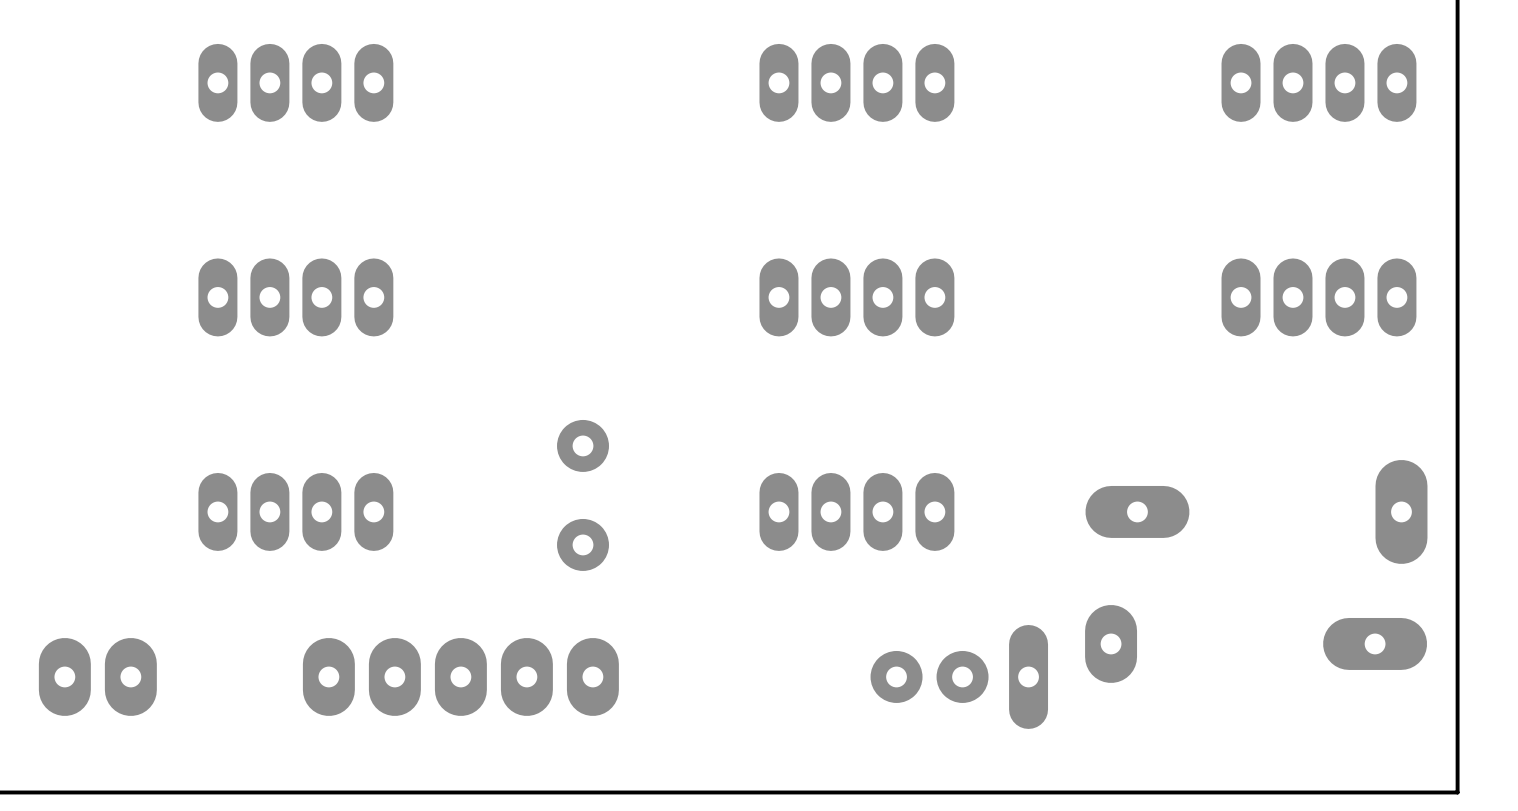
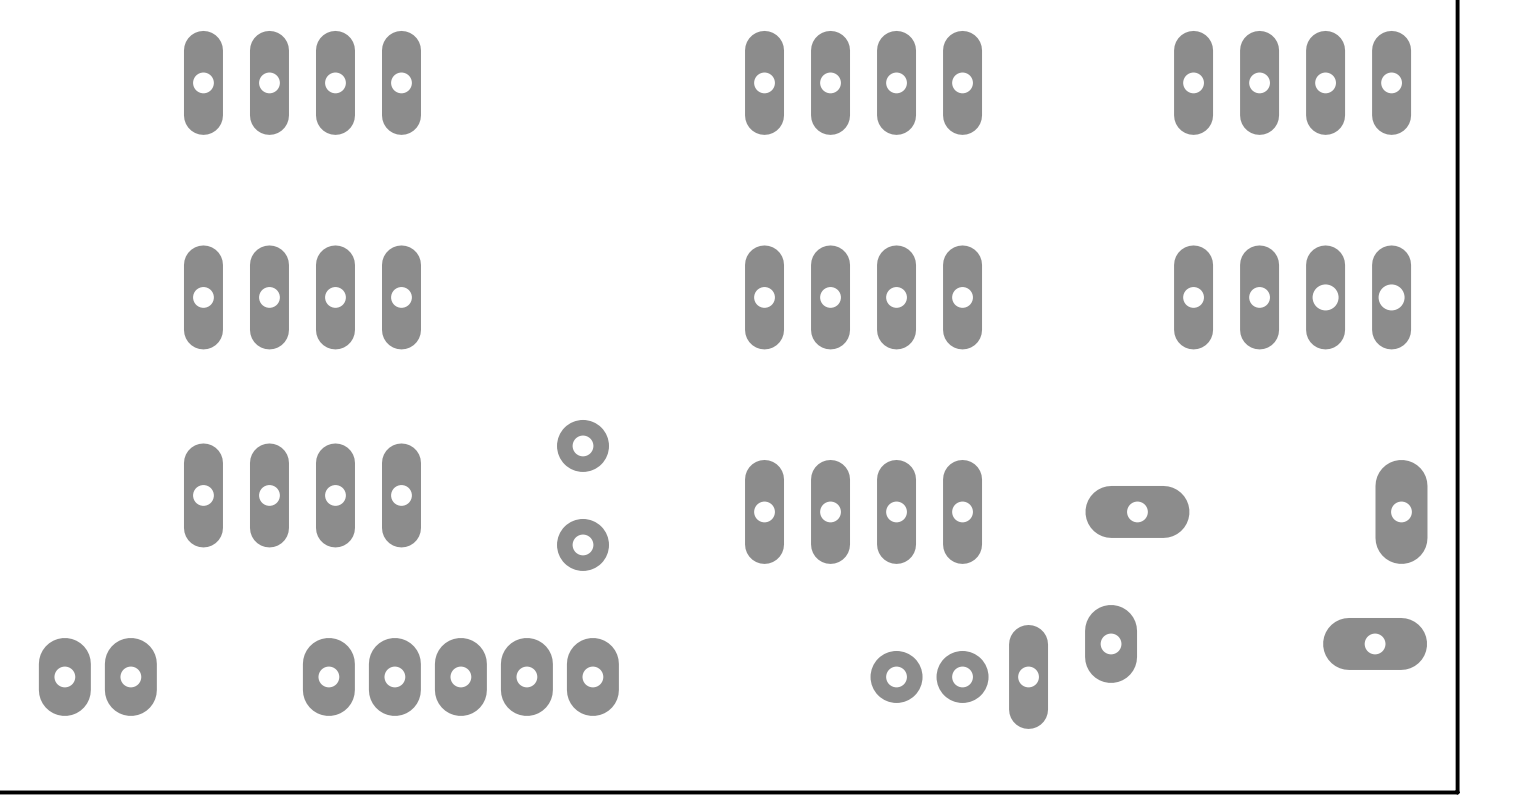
part footprint: [198, 43, 394, 122] -> [183, 30, 421, 135]
part footprint: [759, 43, 955, 122] -> [745, 30, 983, 135]
part: none -> (1292, 82)
part: (1318, 82) -> none
part footprint: [198, 258, 394, 337] -> [183, 245, 421, 350]
part footprint: [759, 258, 955, 337] -> [745, 245, 983, 350]
part: none -> (1292, 297)
part: (1318, 297) -> none
part footprint: [198, 472, 394, 551] -> [183, 443, 421, 548]
part footprint: [759, 472, 955, 551] -> [745, 459, 983, 564]

